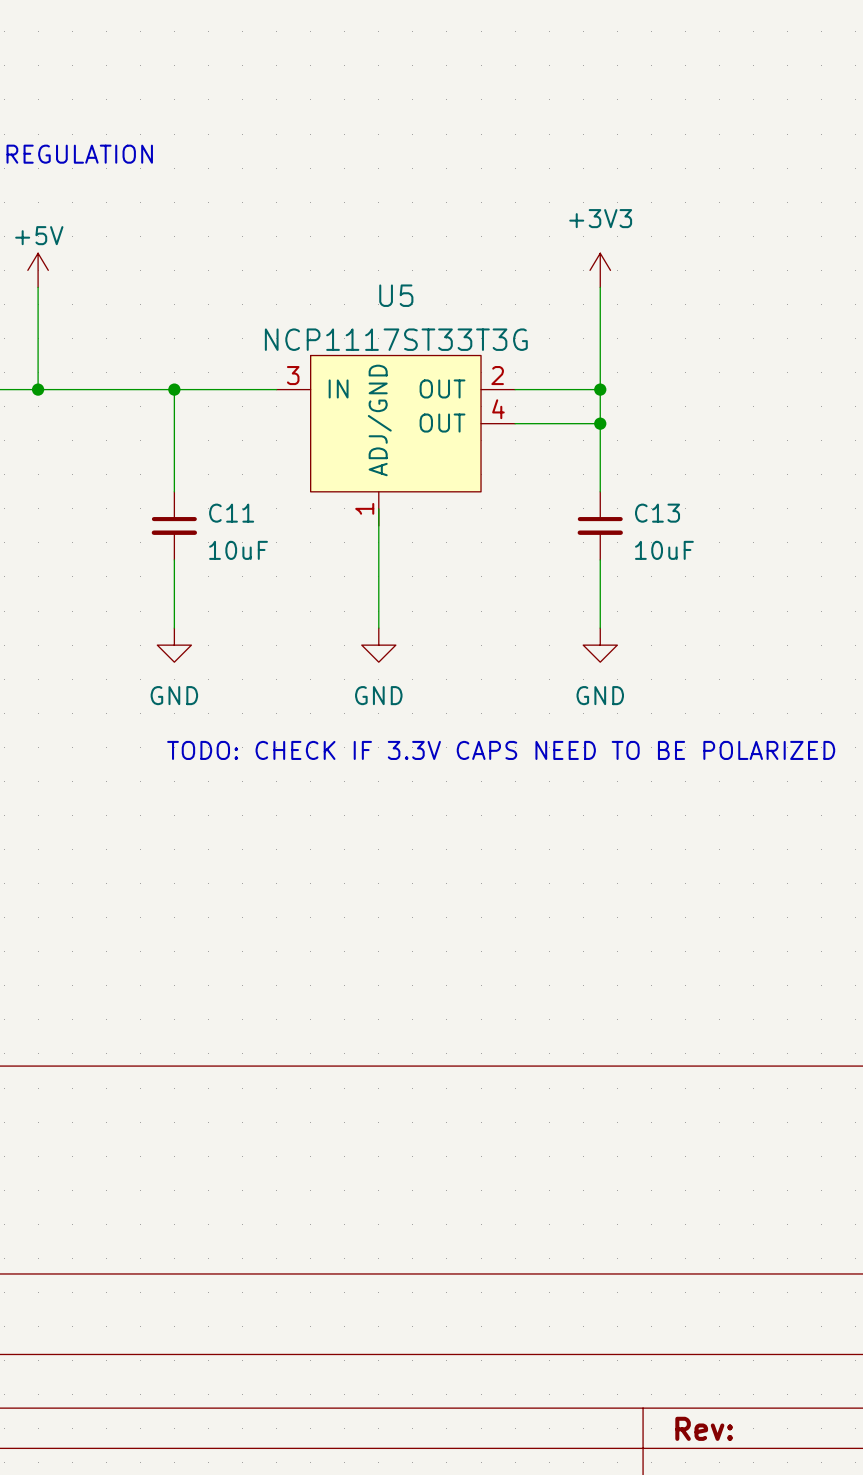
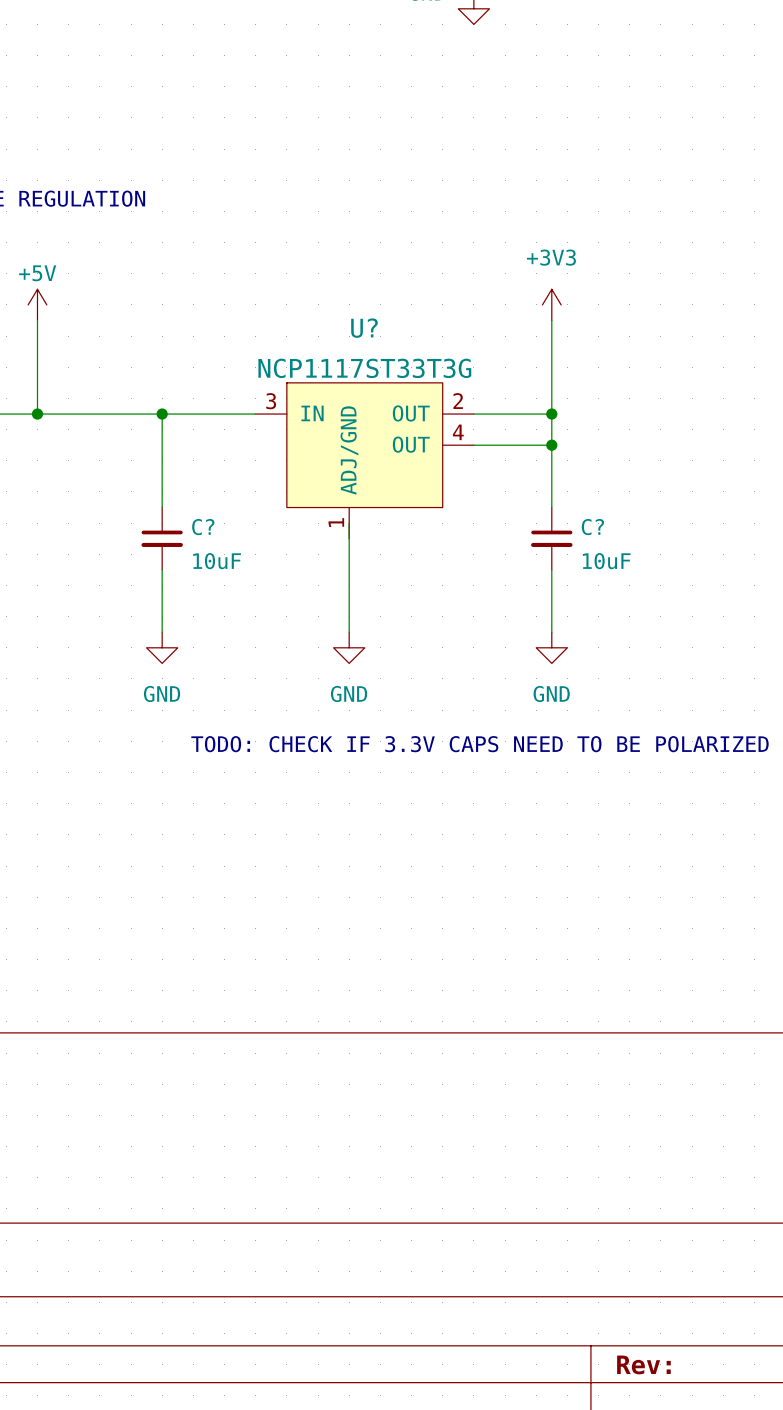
U5 name: U5 (396, 295) -> U? (364, 328)
C11 name: C11 (231, 513) -> C? (203, 527)
C13 name: C13 (657, 513) -> C? (592, 527)

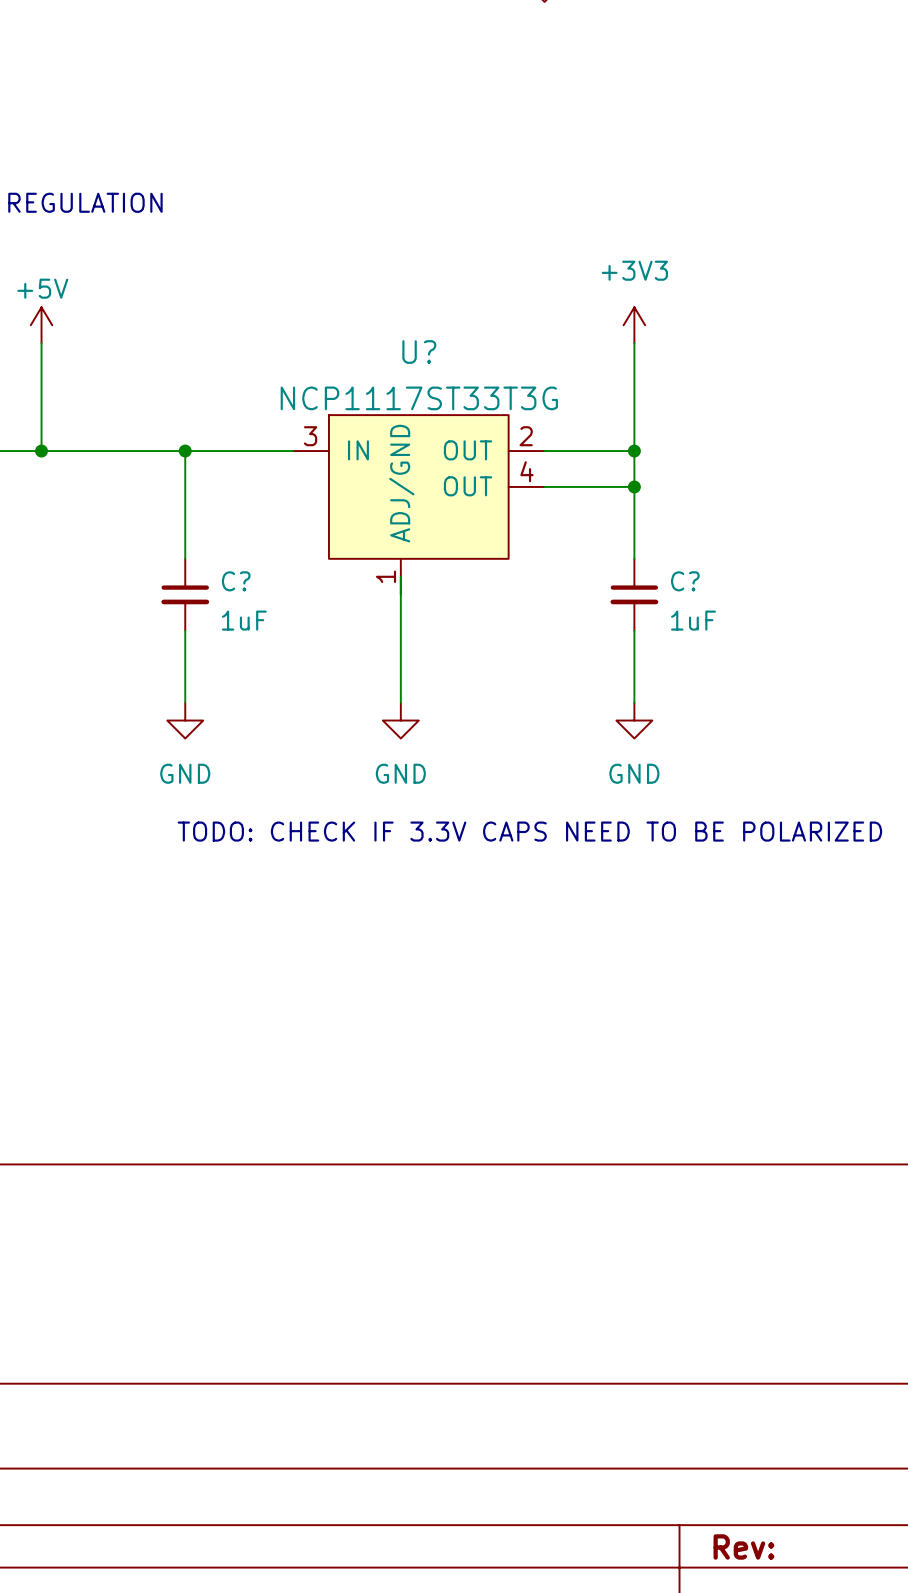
C? value: 10uF (217, 561) -> 1uF (244, 620)
C? value: 10uF (606, 561) -> 1uF (693, 620)

